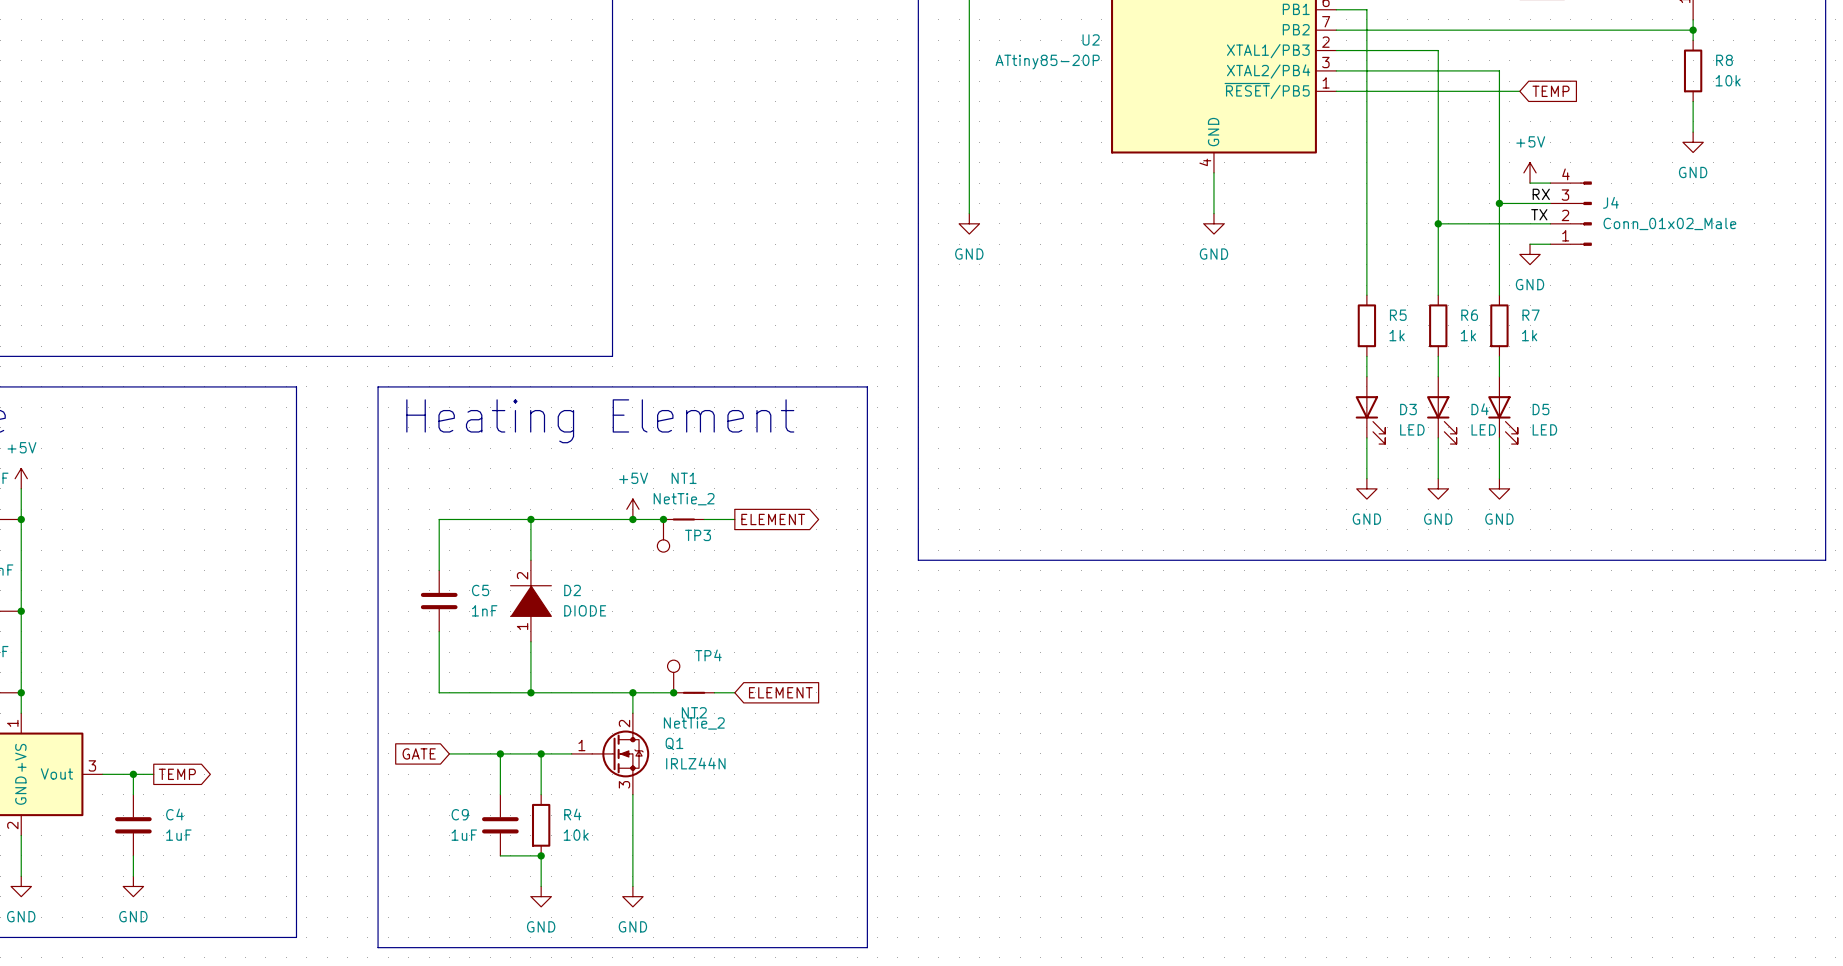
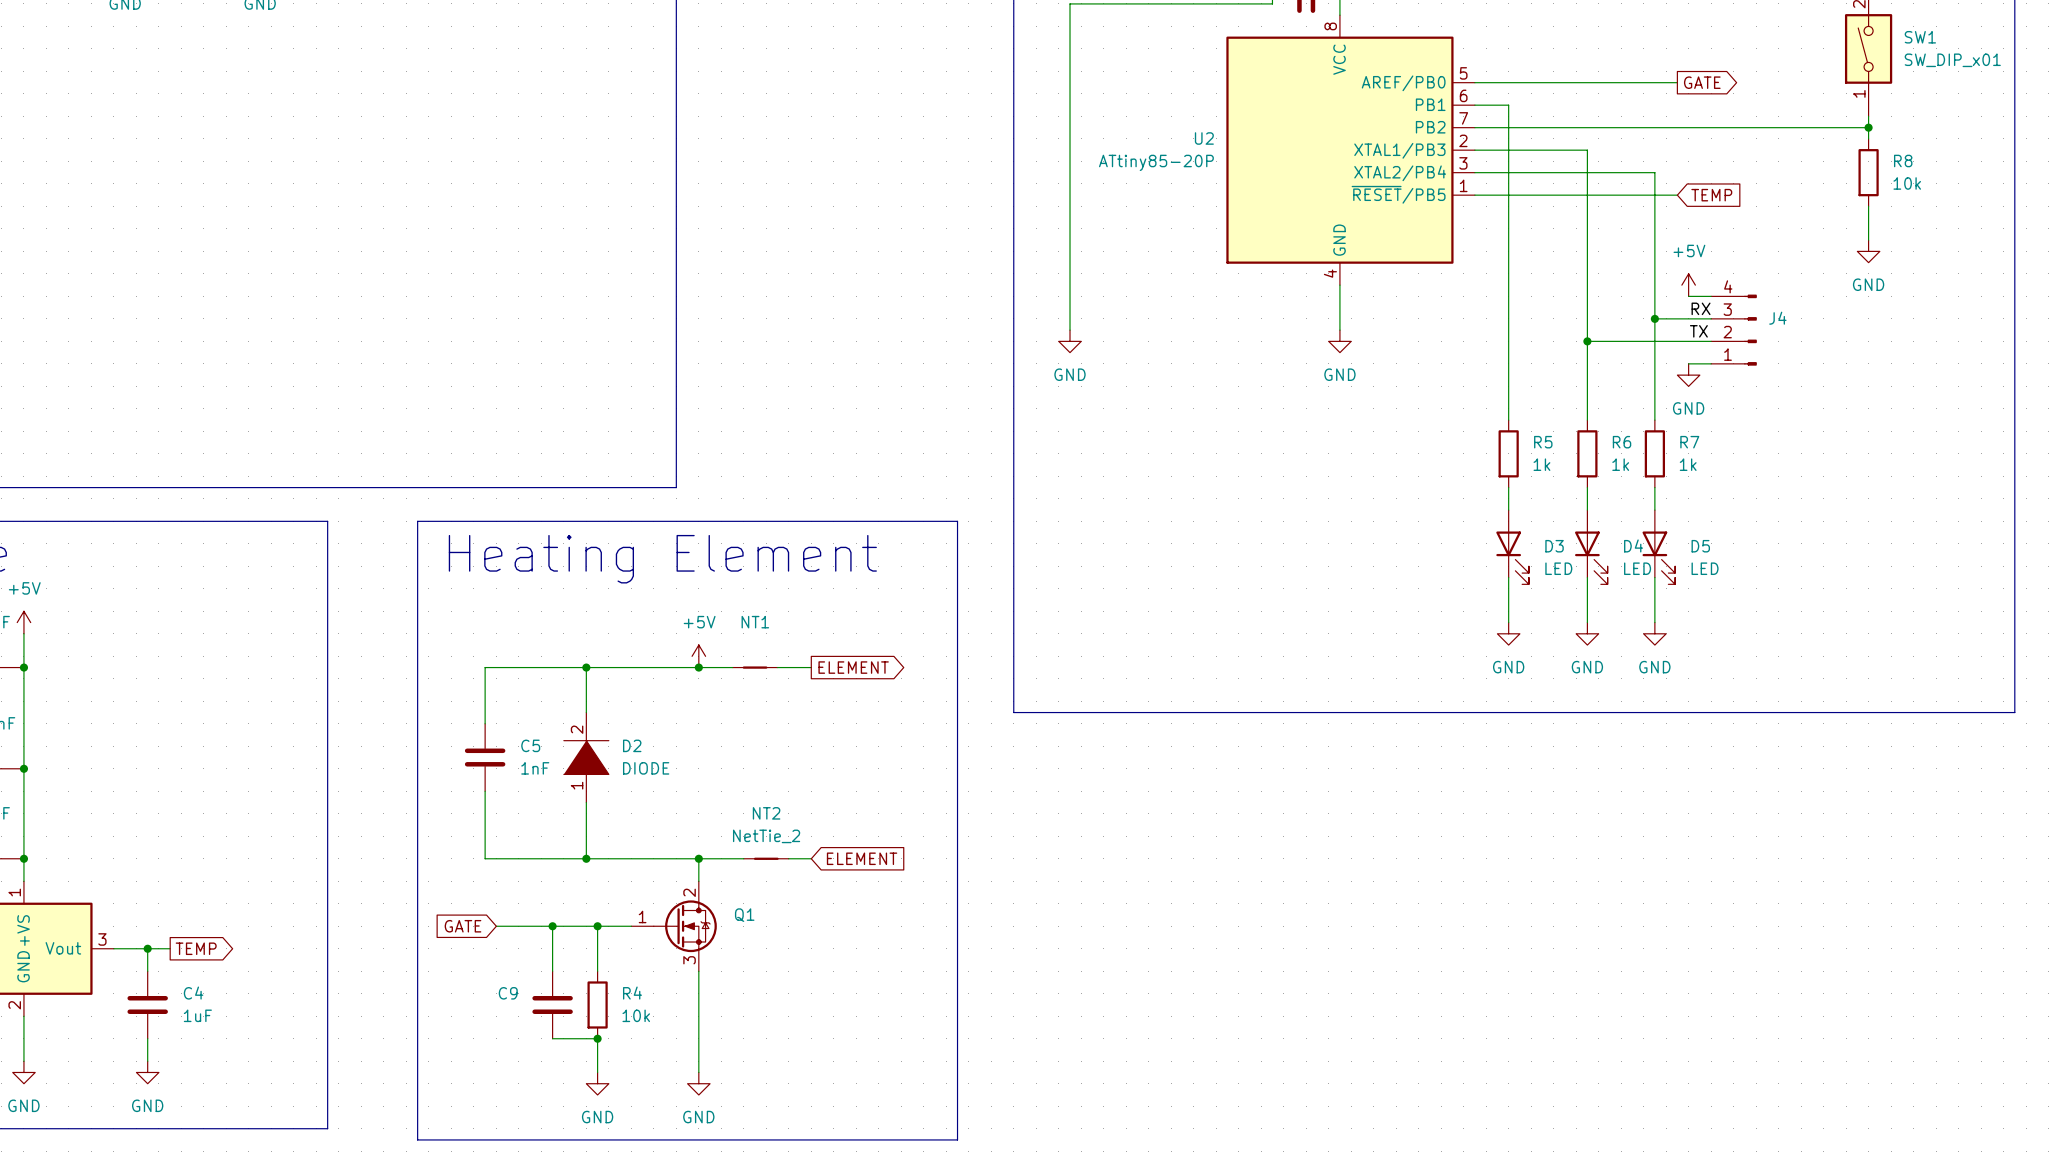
J4 value: Conn_01x02_Male (1669, 223) -> none
NT1 value: NetTie_2 (684, 499) -> none
junction: (663, 519) -> none
TP3: (663, 535) -> none
TP4: (673, 676) -> none
junction: (673, 692) -> none
NT2 name position: NT2 (694, 712) -> NT2 (766, 813)
NT2 value position: NetTie_2 (694, 723) -> NetTie_2 (766, 836)
Q1 value: IRLZ44N (695, 763) -> none
C9 value: 1uF (464, 835) -> none

